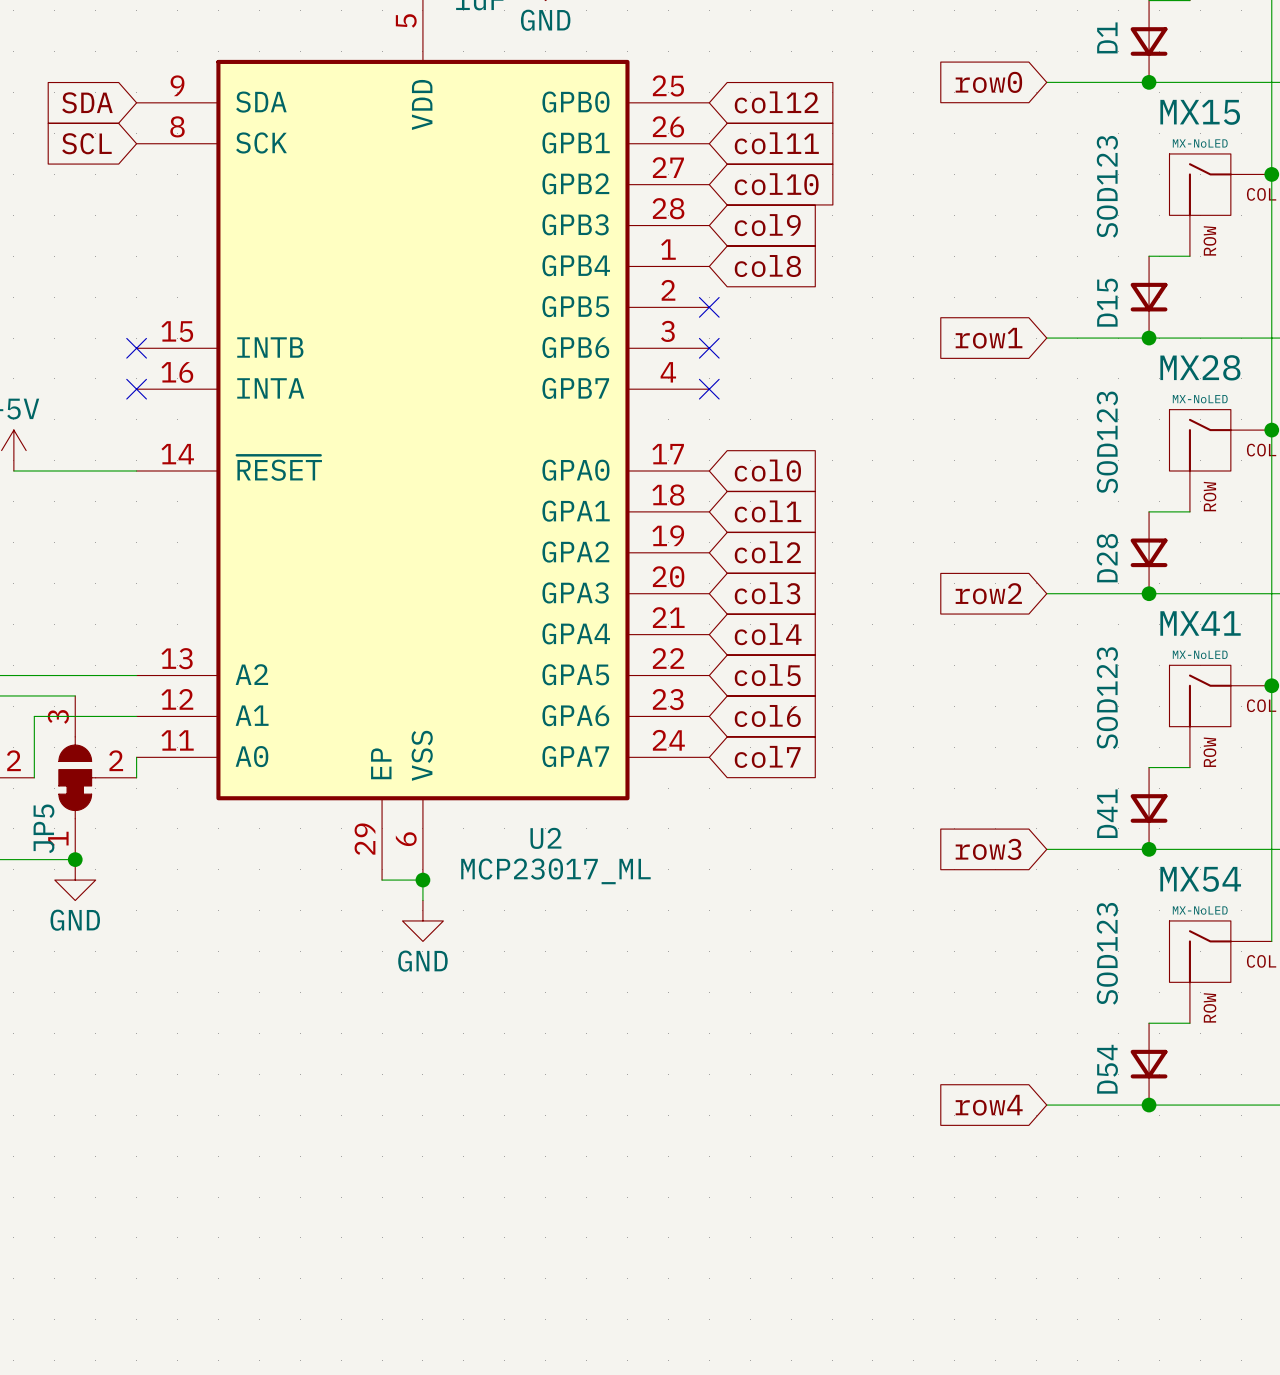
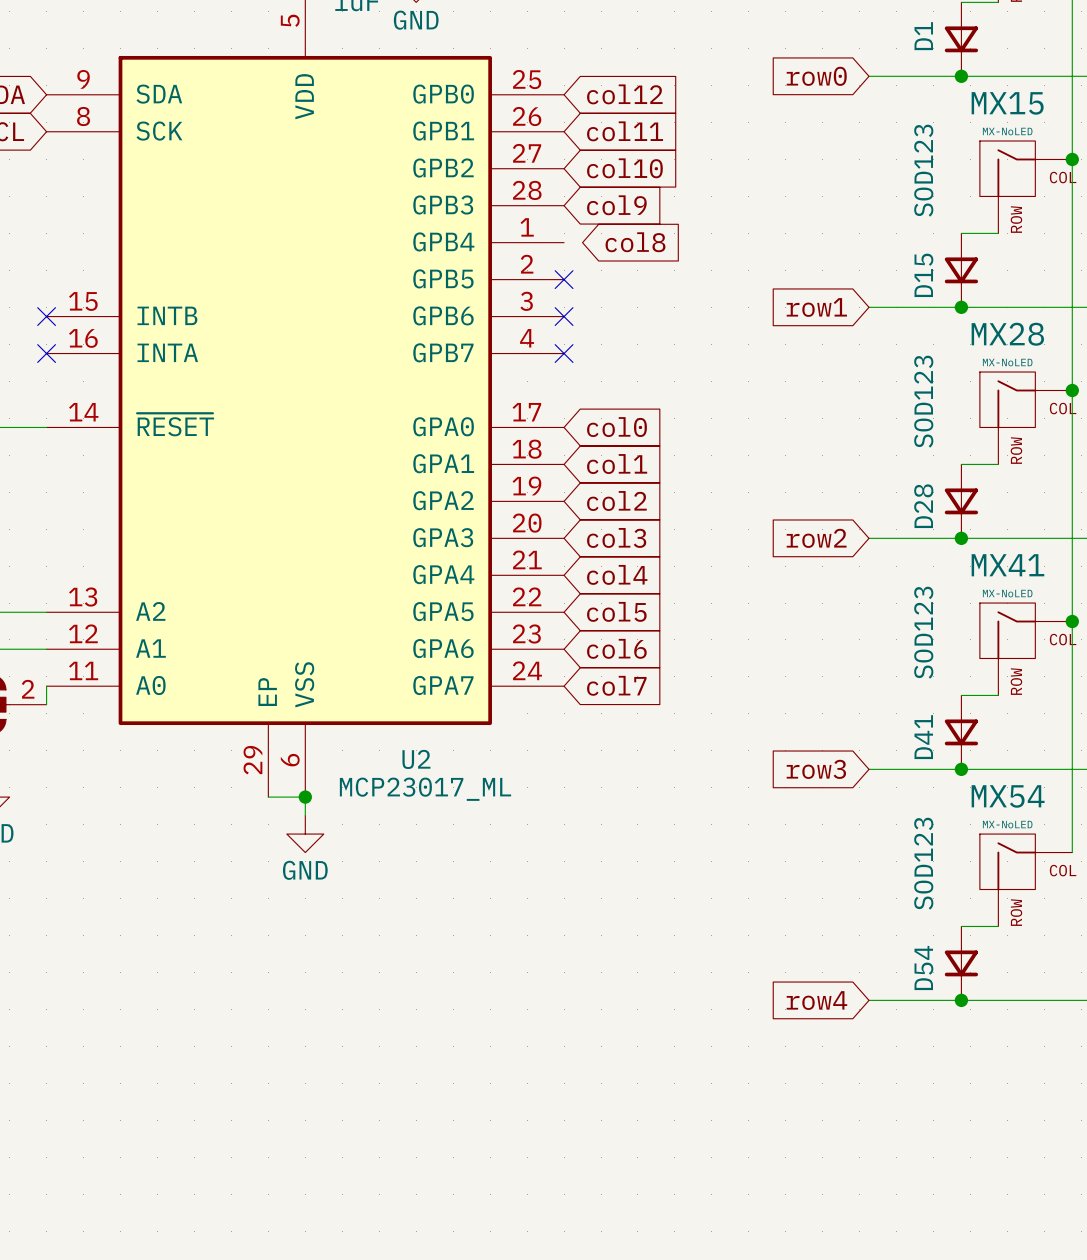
global label position: col8 (767, 266) -> col8 (635, 242)

